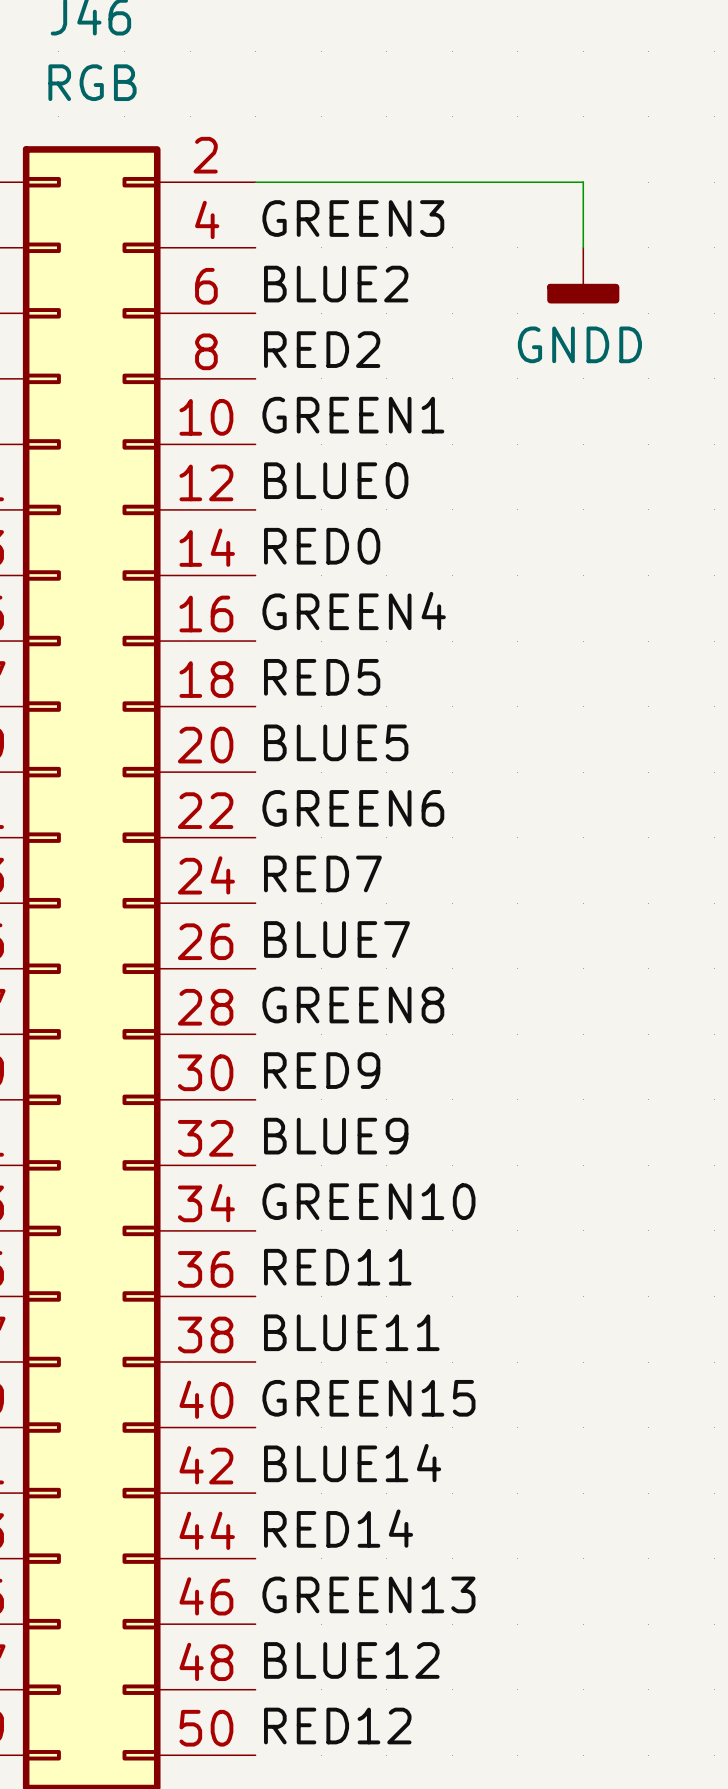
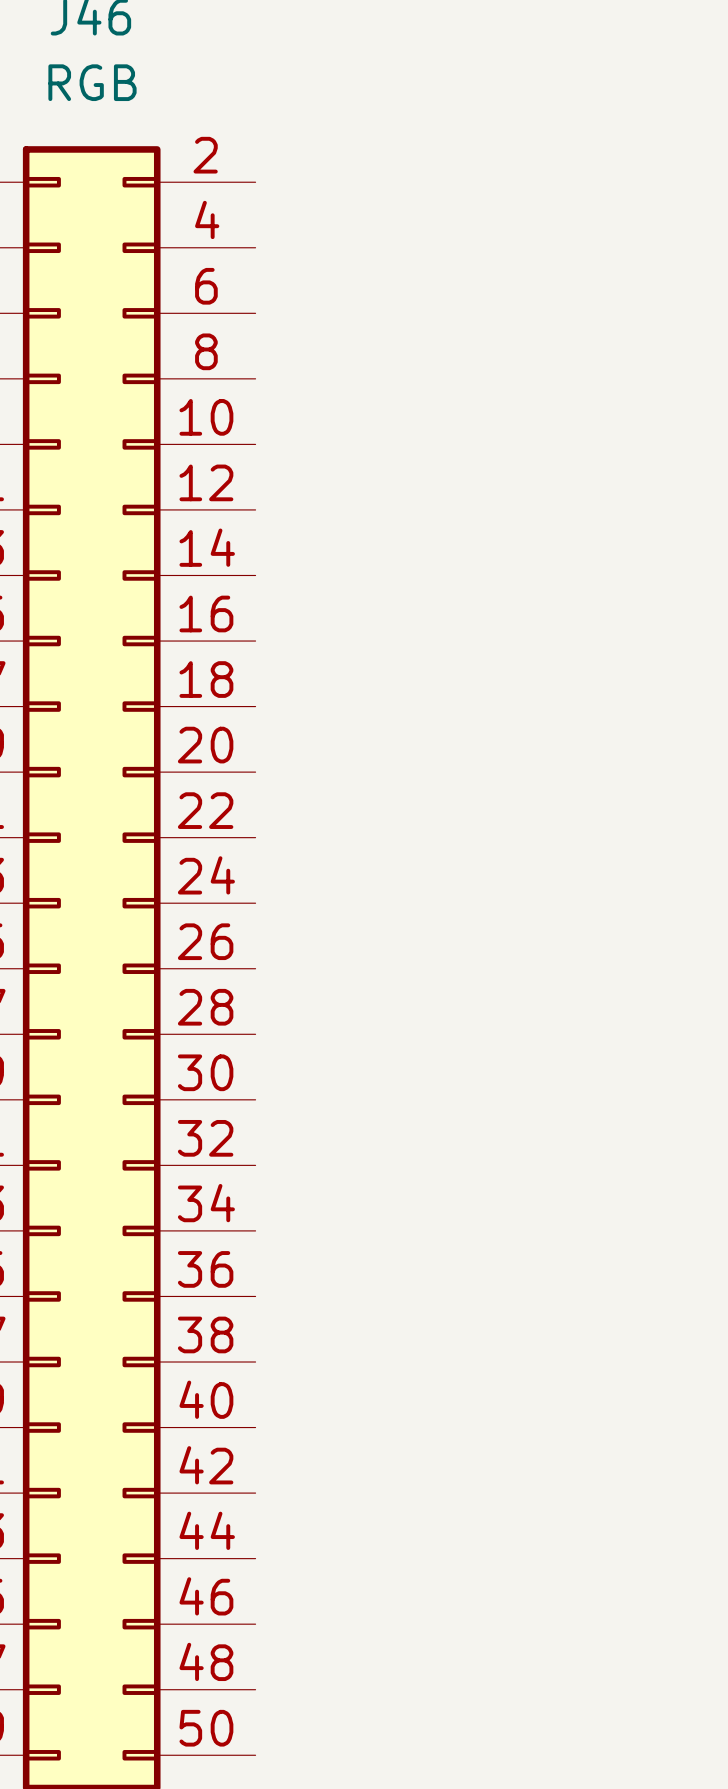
wire: (255, 182) (583, 182) (583, 247) -> none
label: GREEN3 (353, 218) -> none
power symbol: GNDD (583, 275) -> none
label: BLUE2 (336, 284) -> none
label: RED2 (322, 349) -> none
label: GREEN1 (353, 415) -> none
label: BLUE0 (336, 480) -> none
label: RED0 (322, 546) -> none
label: GREEN4 (354, 611) -> none
label: RED5 (322, 677) -> none
label: BLUE5 (336, 742) -> none
label: GREEN6 (353, 808) -> none
label: RED7 (322, 873) -> none
label: BLUE7 (336, 939) -> none
label: GREEN8 (353, 1005) -> none
label: RED9 (322, 1070) -> none
label: BLUE9 (336, 1136) -> none
label: GREEN10 (368, 1201) -> none
label: RED11 (337, 1267) -> none
label: BLUE11 (351, 1332) -> none
label: GREEN15 (368, 1398) -> none
label: BLUE14 (352, 1463) -> none
label: RED14 (338, 1528) -> none
label: GREEN13 (368, 1594) -> none
label: BLUE12 (351, 1660) -> none
label: RED12 (337, 1726) -> none

